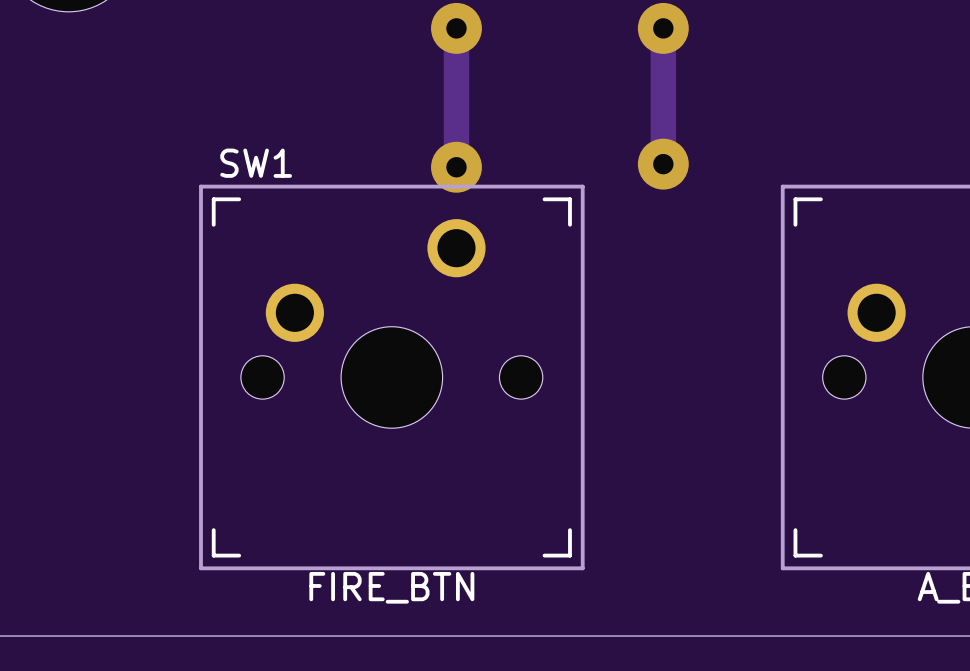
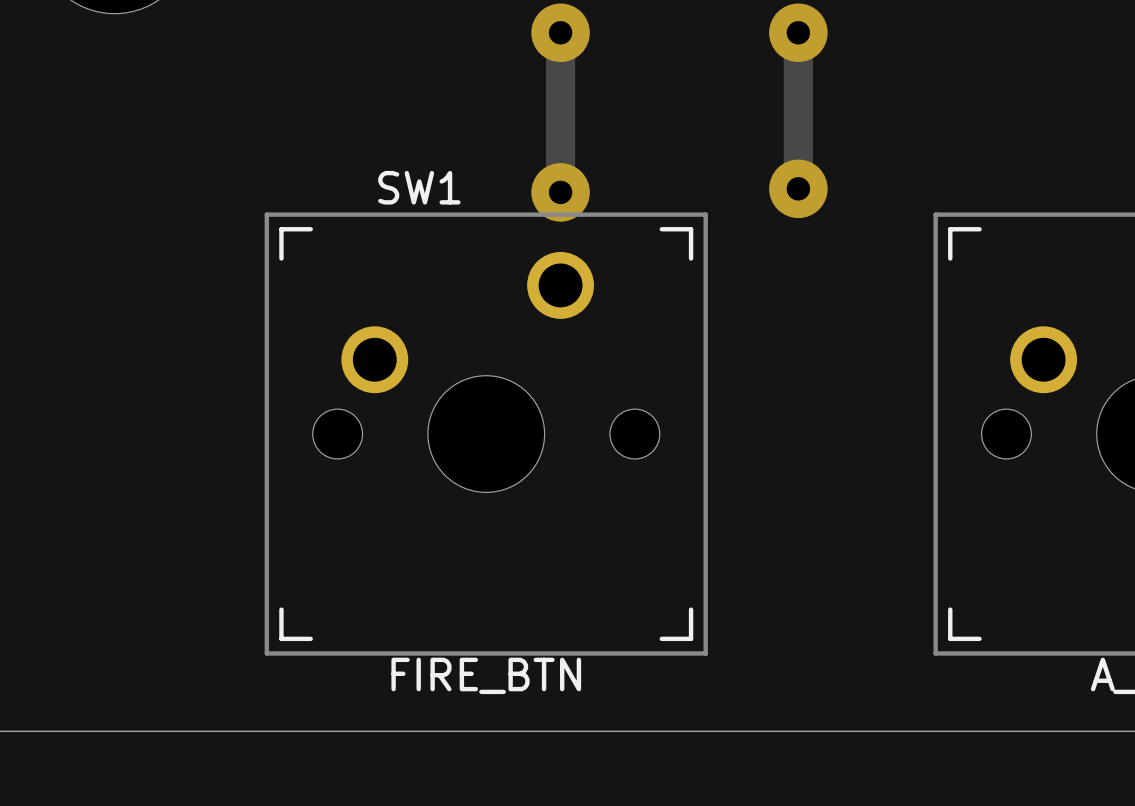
SW1 name position: SW1 (256, 163) -> SW1 (419, 187)

